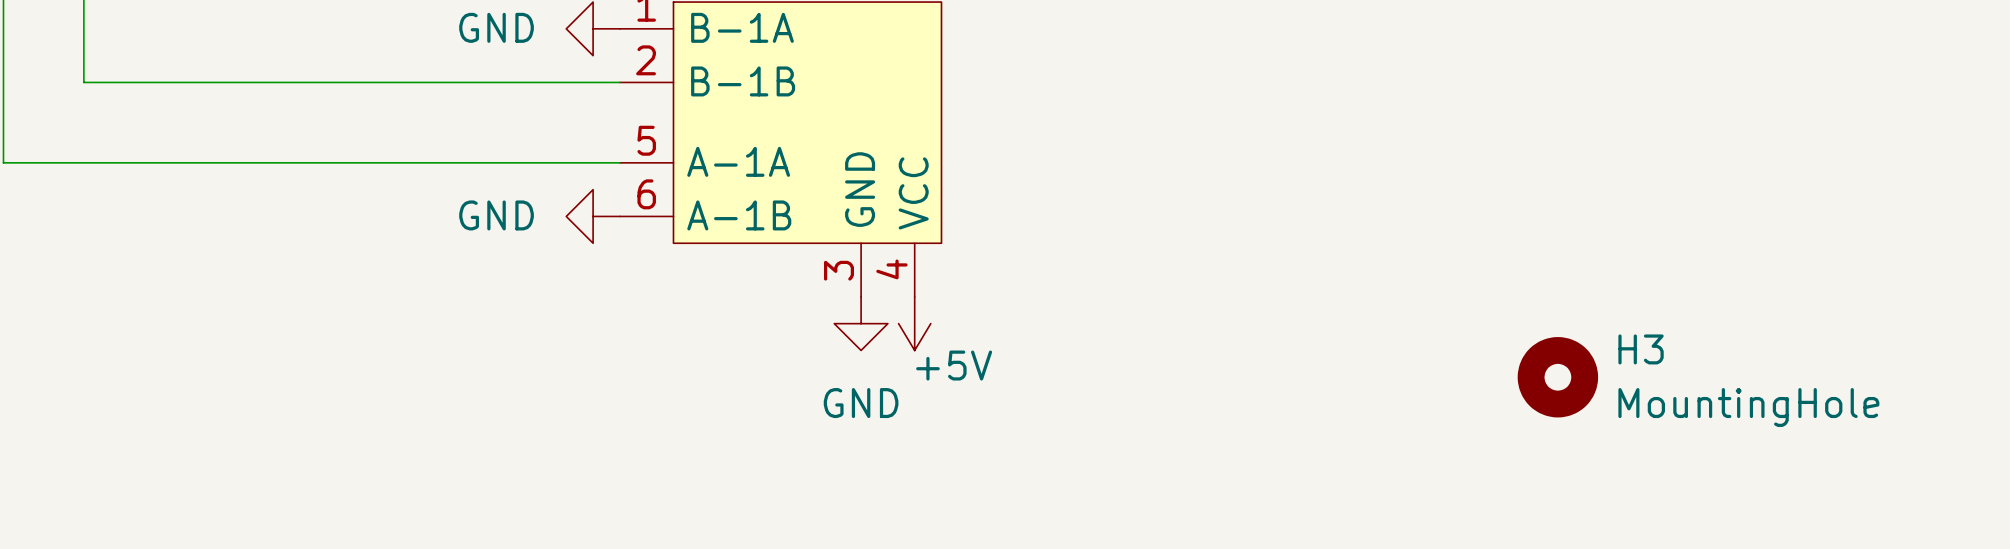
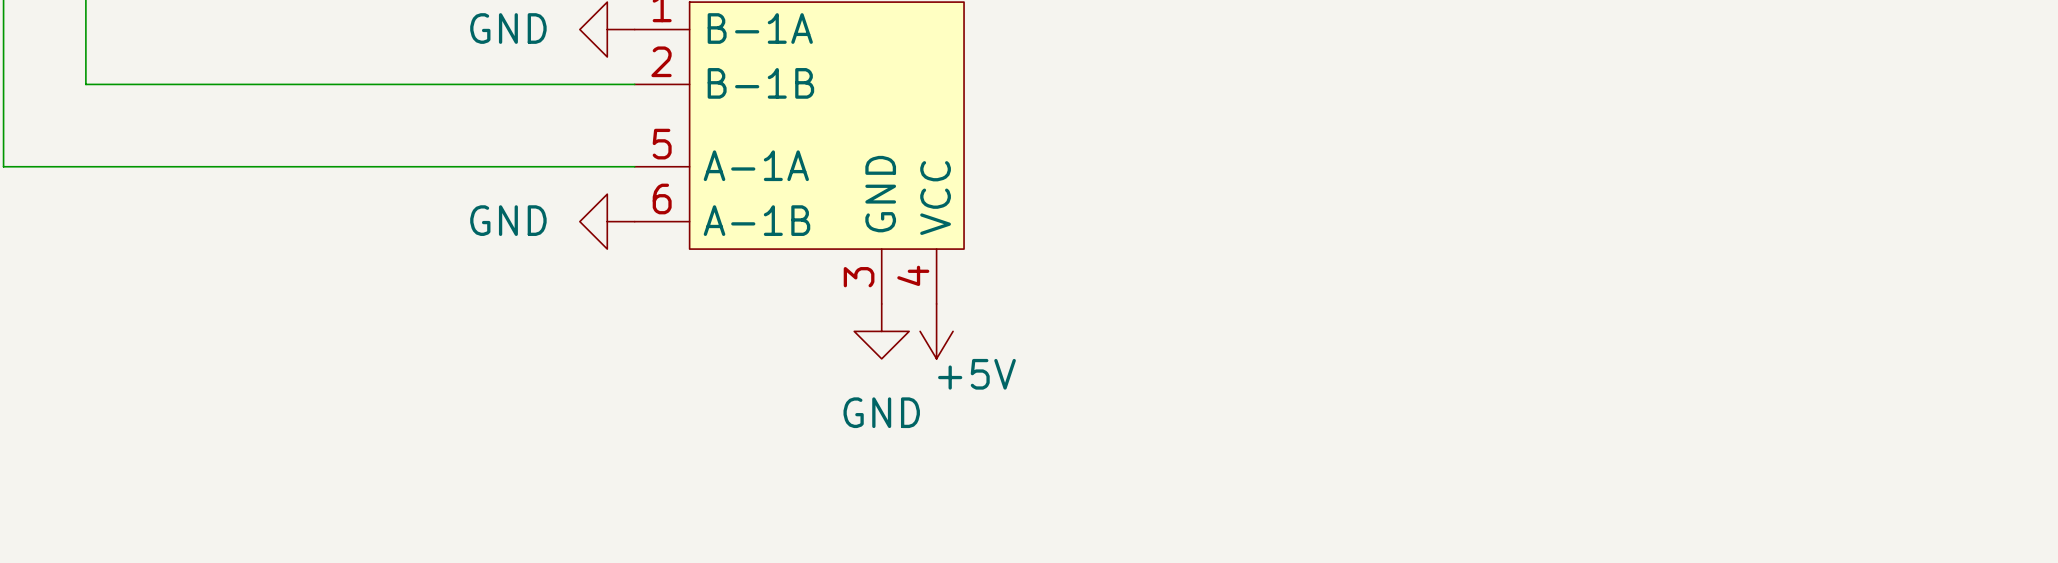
H3: MountingHole (1557, 377) -> none

